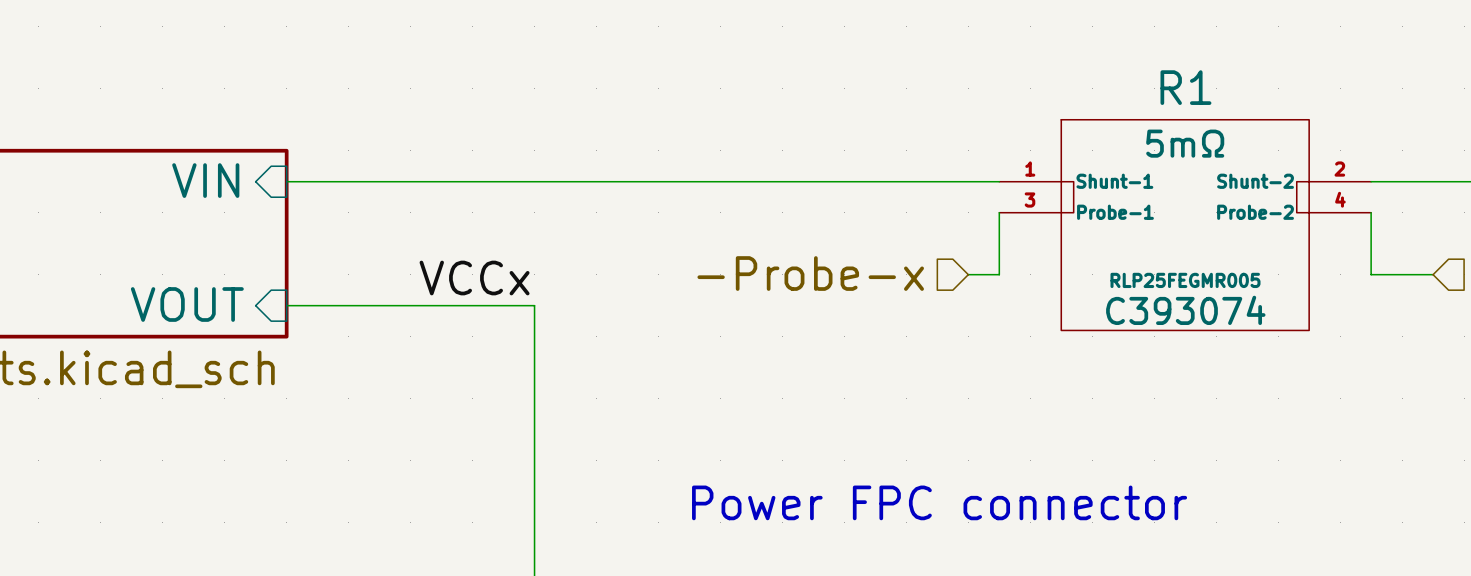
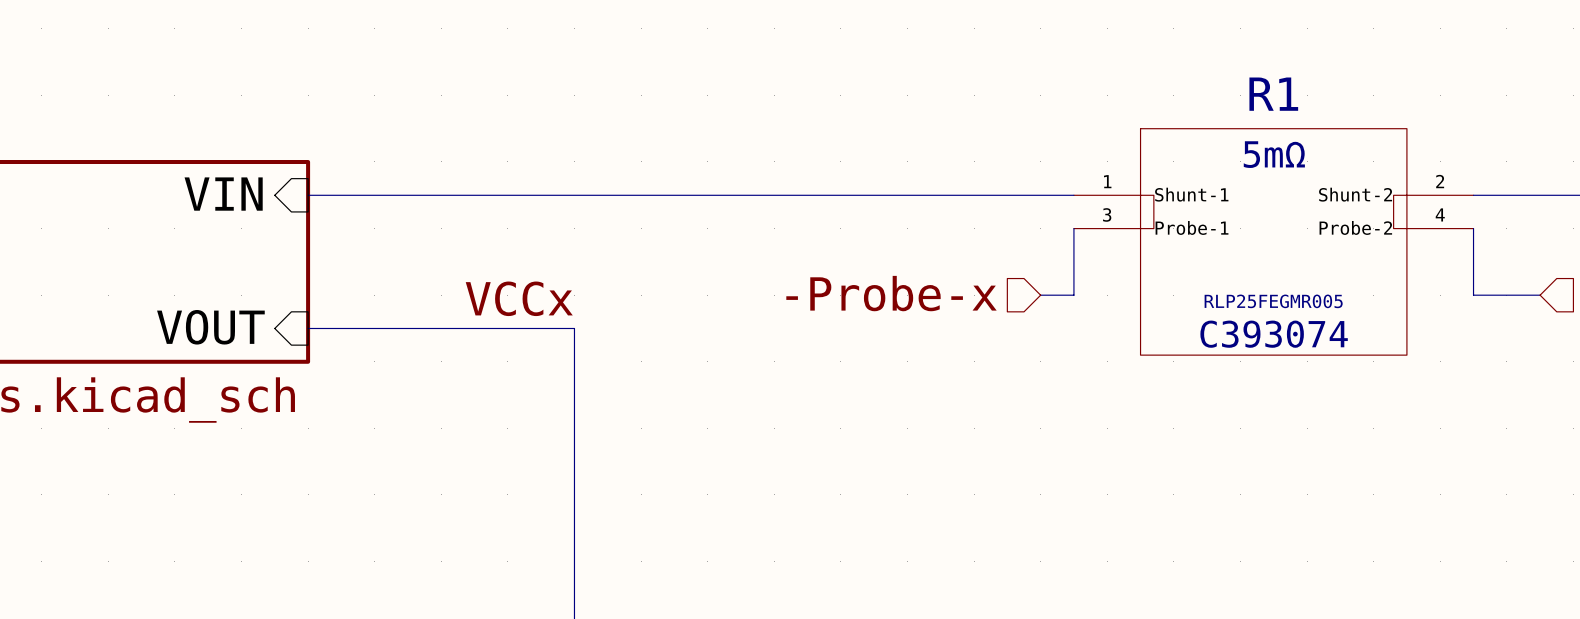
text: Power FPC connector (939, 502) -> none

